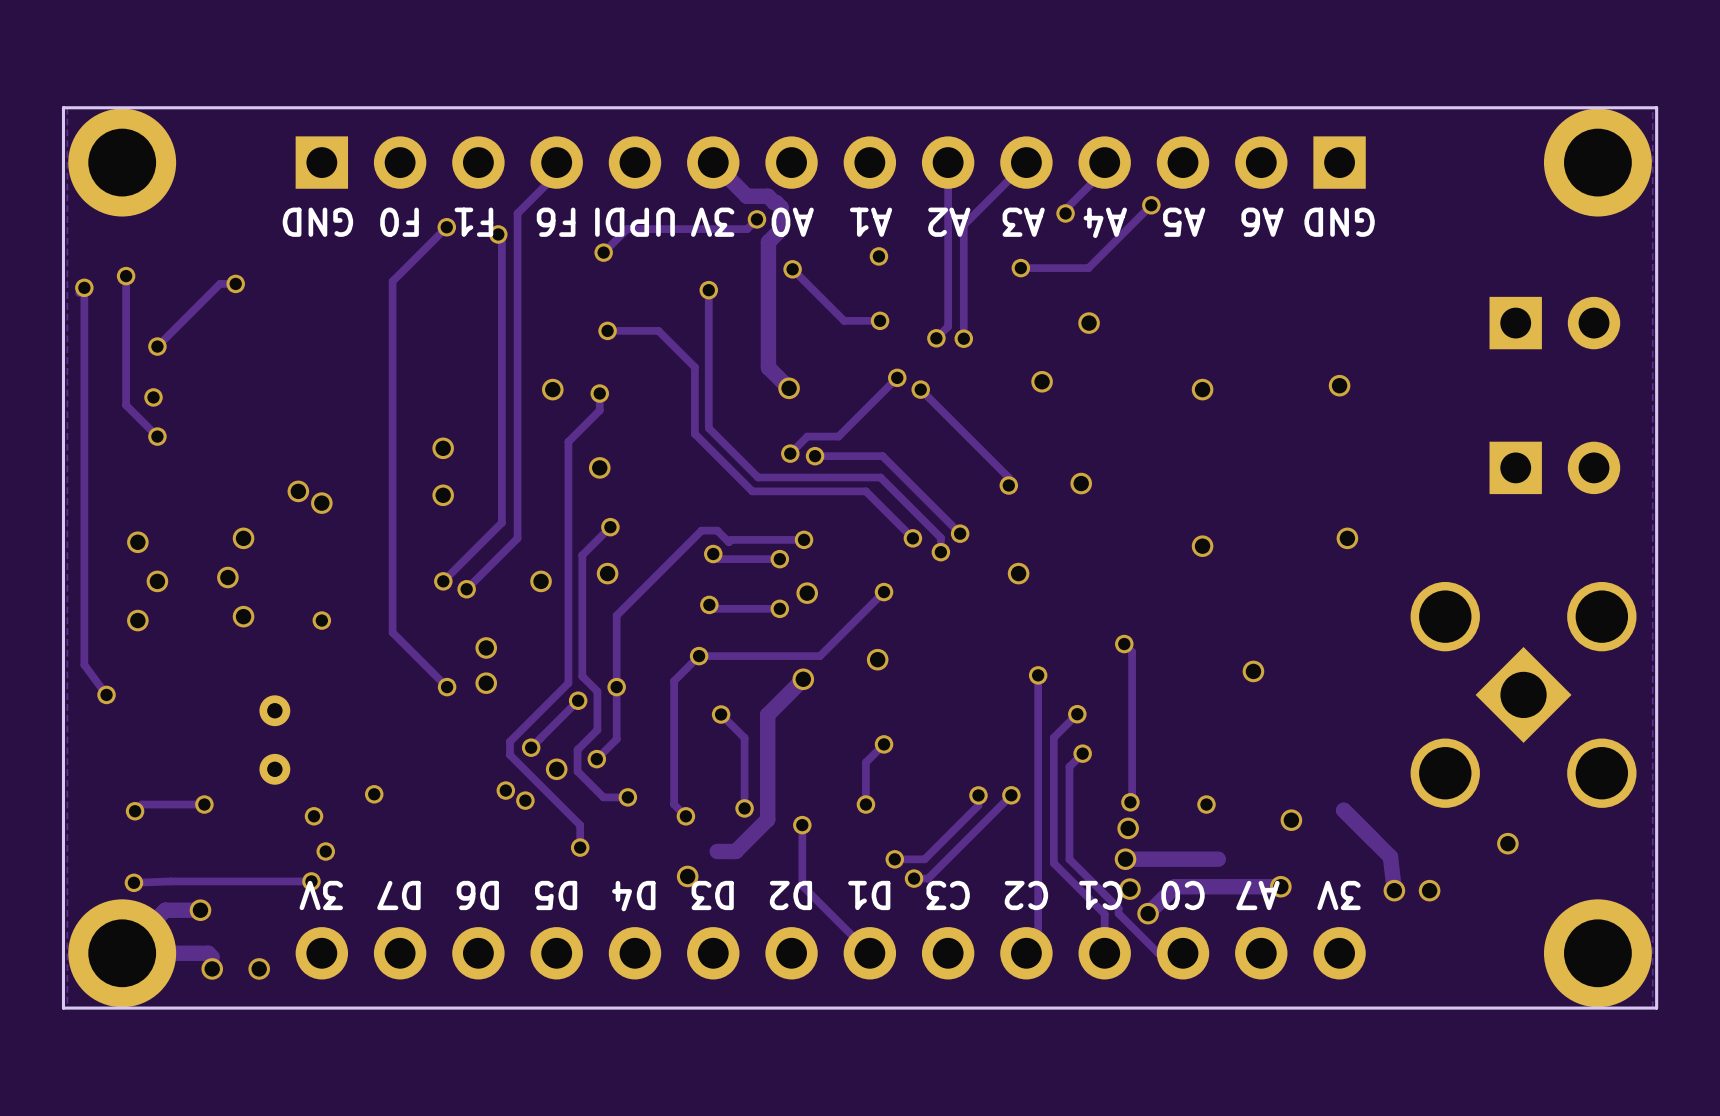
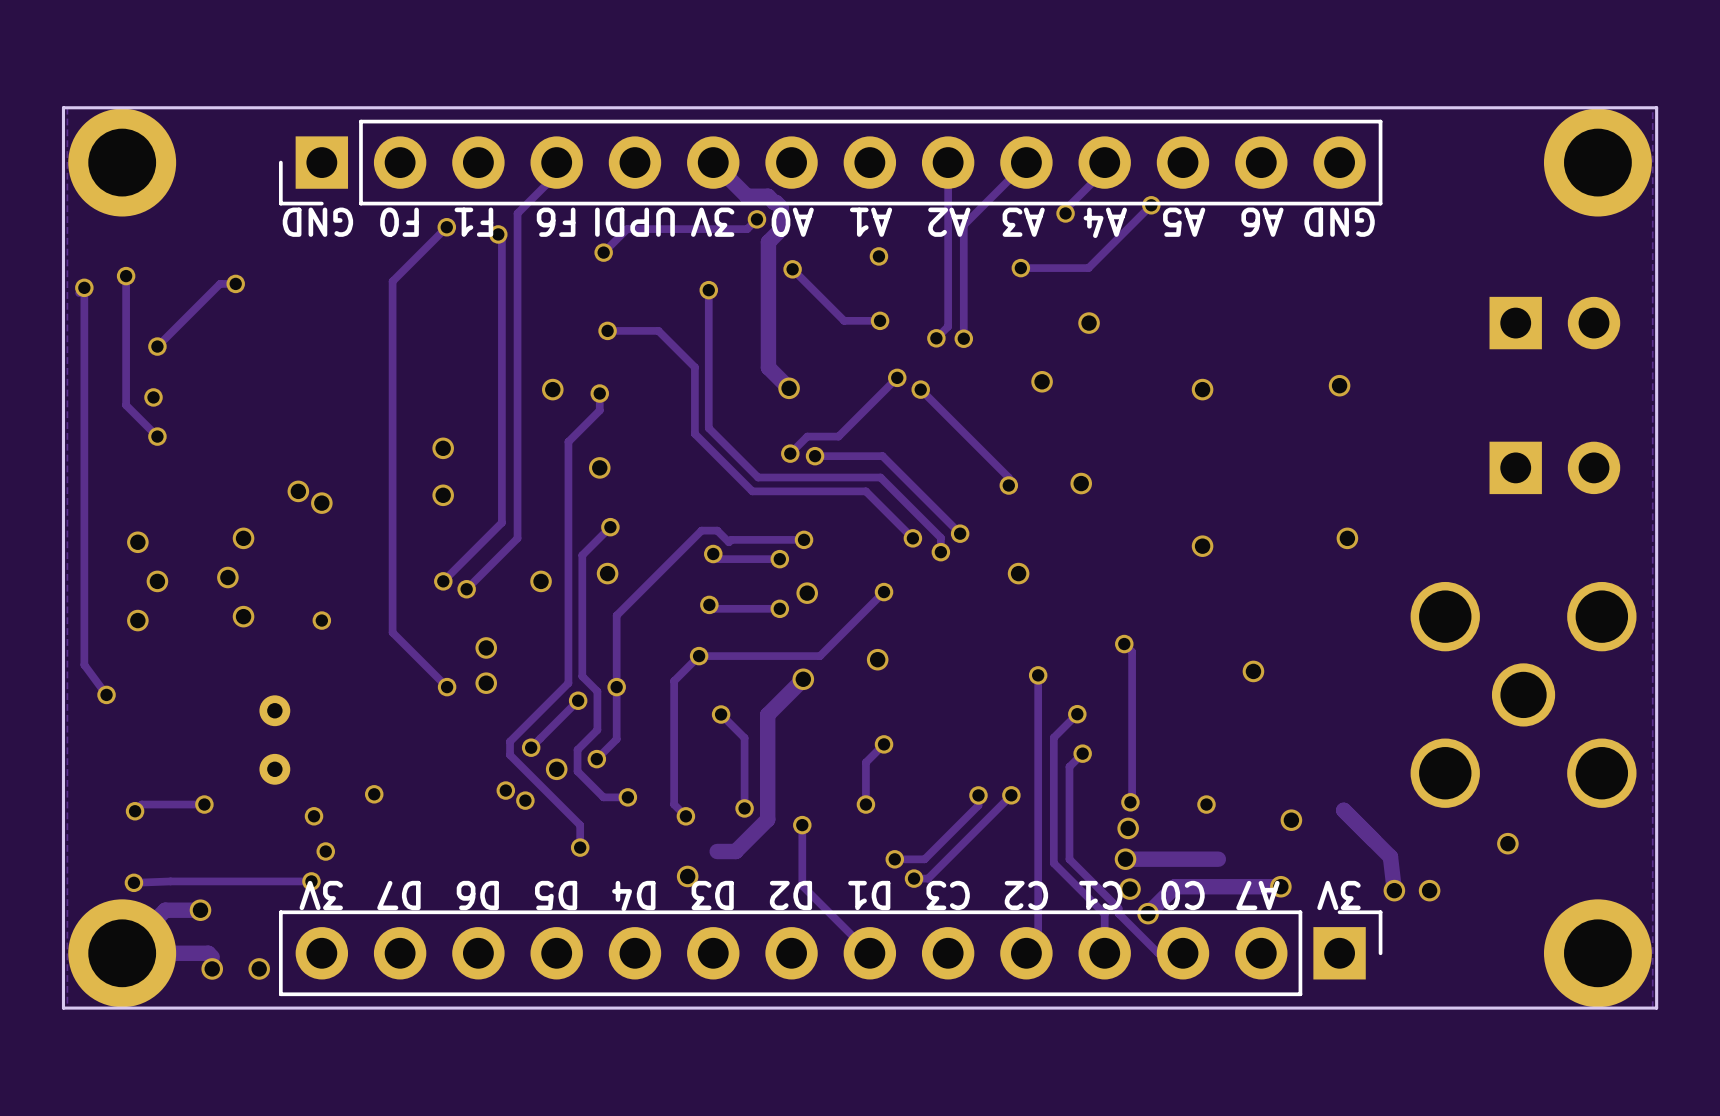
part footprint: [295, 136, 1366, 189] -> [278, 119, 1383, 206]
part footprint: [1410, 581, 1637, 808] -> [1410, 581, 1637, 808]
part footprint: [295, 927, 1366, 980] -> [278, 910, 1383, 997]

